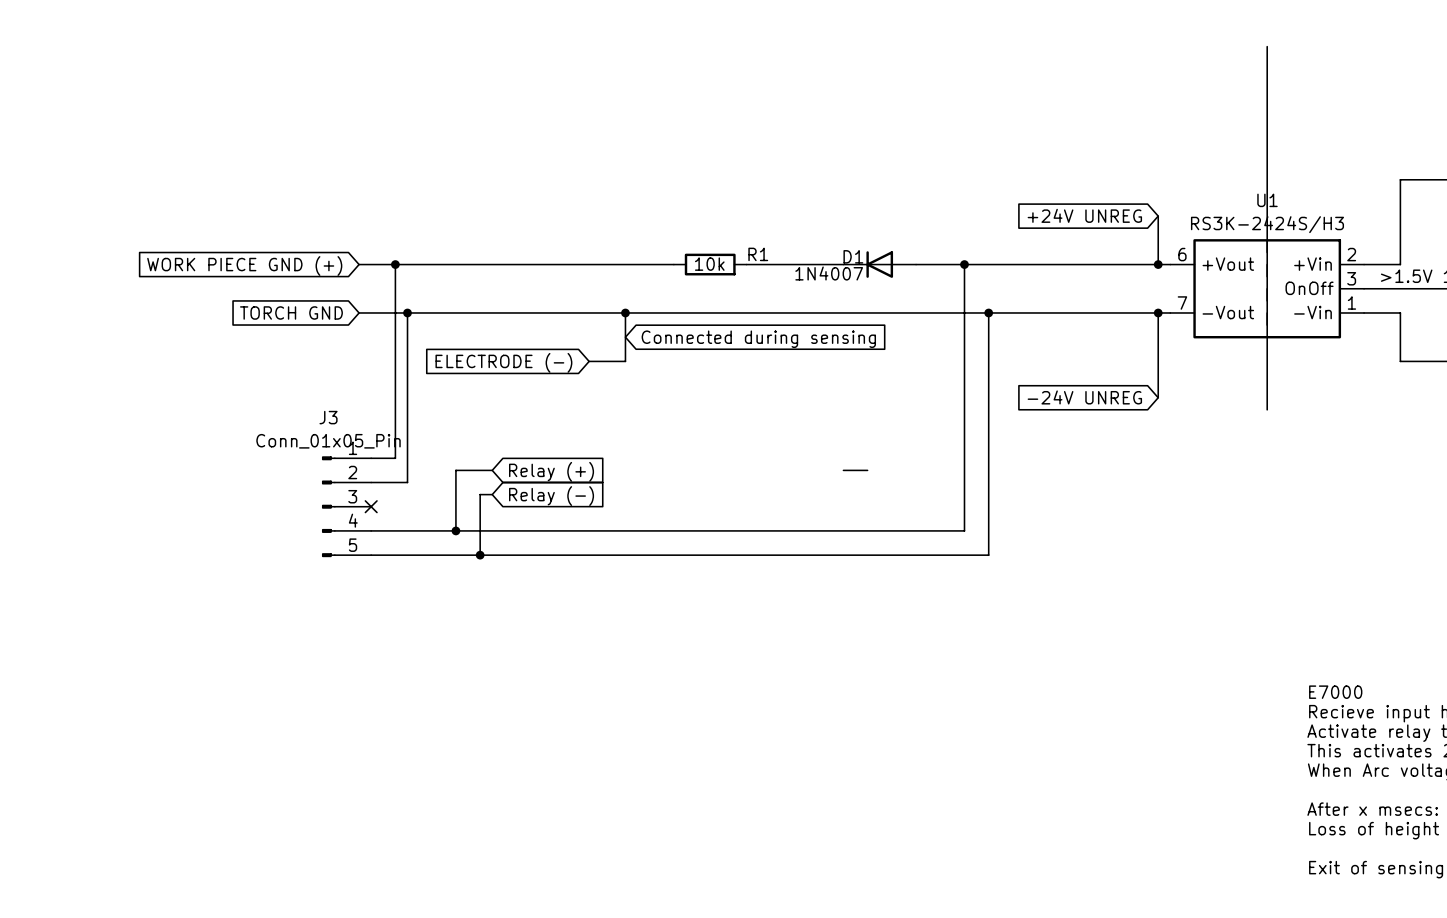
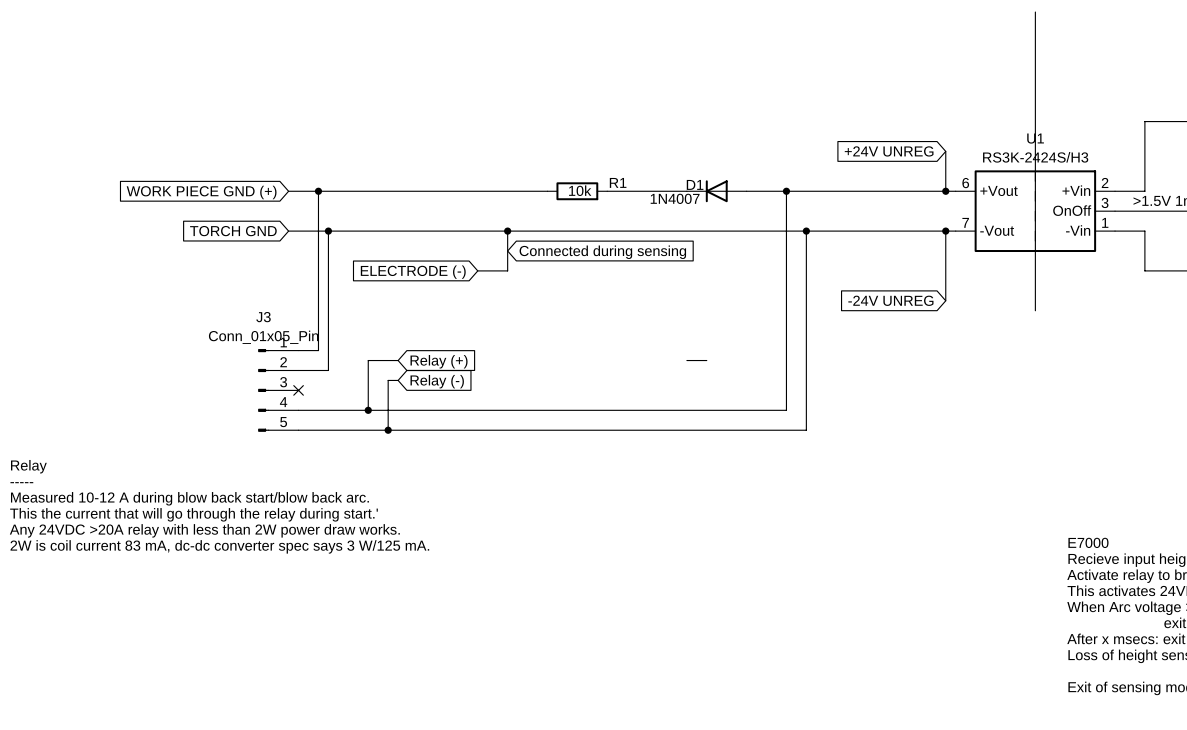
text: none -> Relay (28, 466)
text: none -> ----- (21, 482)
text: none -> Measured 10-12 A during blow back start/blow back arc. (189, 498)
text: none -> This the current that will go through the relay during start.' (194, 514)
text: none -> Any 24VDC >20A relay with less than 2W power draw works. (204, 530)
text: none -> 2W is coil current 83 mA, dc-dc converter spec says 3 W/125 mA. (219, 546)

